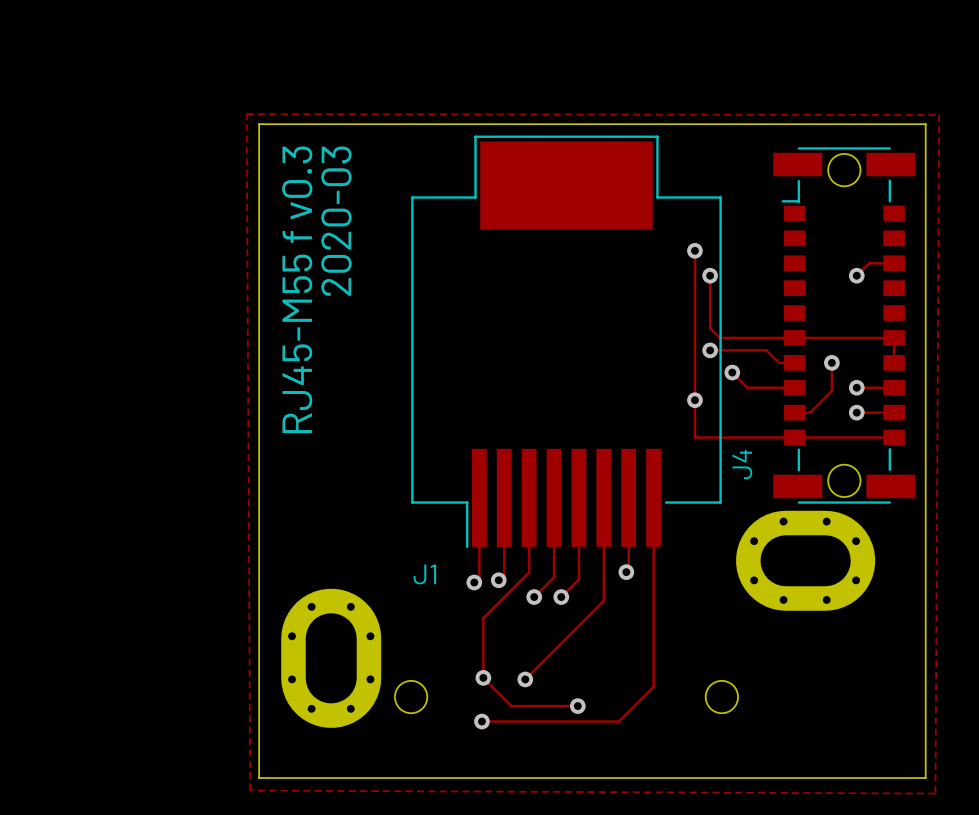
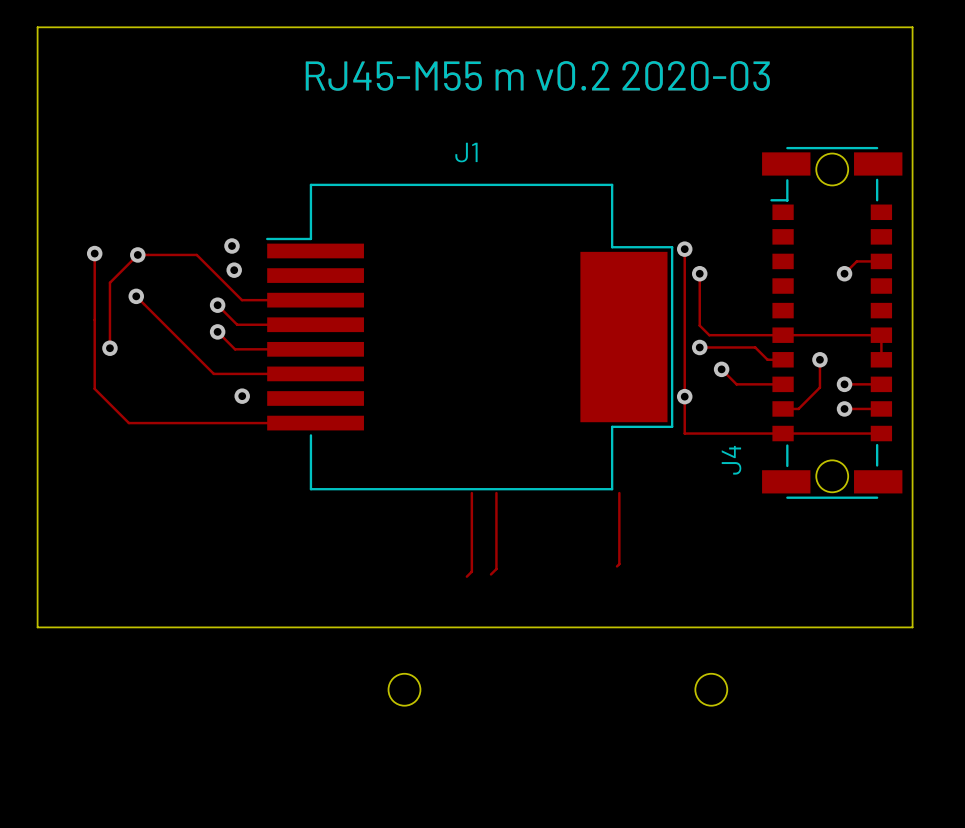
text: none -> RJ45-M55 m v0.2 2020-03 (537, 75)
zone outline: (246, 114) (250, 790) (935, 793) (939, 114) (246, 114) -> none
board edge: (925, 124) (259, 124) (259, 777) (925, 777) (925, 633) -> (912, 124) (912, 27) (37, 27) (37, 627) (912, 627)
text: 2020-03 (336, 221) -> none
via: none -> (231, 246)
track: none -> (94, 253) (94, 388) (128, 423) (315, 423)
via: none -> (94, 253)
via: none -> (137, 254)
via: none -> (234, 270)
text: RJ45-M55 f v0.3 (297, 289) -> none
track: none -> (136, 296) (213, 373) (315, 373)
via: none -> (136, 296)
track: none -> (315, 300) (241, 300) (196, 254) (137, 254) (109, 282) (109, 348)
track: none -> (217, 305) (237, 324) (315, 324)
via: none -> (217, 305)
track: none -> (217, 331) (235, 349) (315, 349)
via: none -> (217, 331)
J1 rotation: 0° (566, 341) -> 90° clockwise (469, 337)
via: none -> (109, 348)
via: none -> (242, 396)
track: (529, 497) (529, 572) (483, 618) (483, 677) (511, 706) (577, 706) -> none
track: (554, 497) (554, 577) (534, 597) -> none
track: (578, 497) (578, 579) (561, 597) -> none
track: (603, 497) (603, 600) (525, 679) -> none
track: (653, 497) (653, 686) (618, 721) (481, 721) -> none
part: (805, 560) -> none
via: (626, 572) -> none
J1 name position: J1 (424, 574) -> J1 (466, 152)
via: (498, 580) -> none
via: (474, 582) -> none
via: (534, 597) -> none
via: (561, 597) -> none
part: (331, 658) -> none
via: (483, 677) -> none
via: (525, 679) -> none
via: (577, 706) -> none
via: (481, 721) -> none

